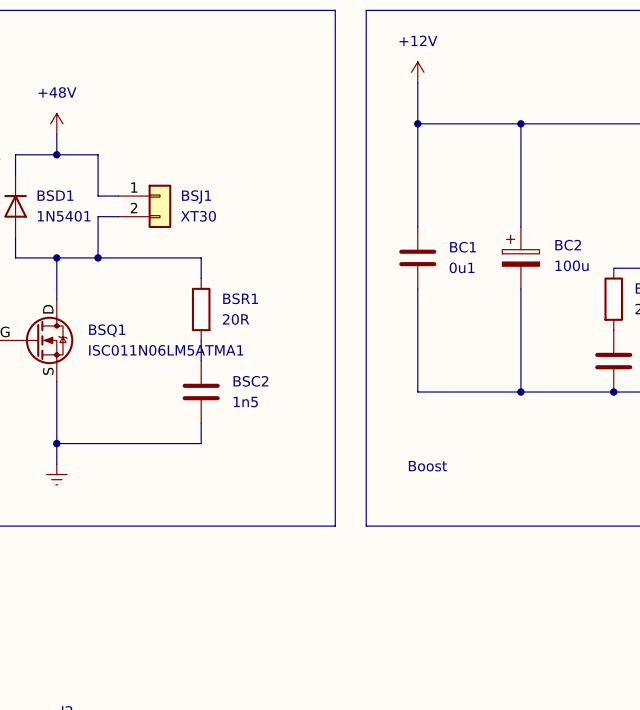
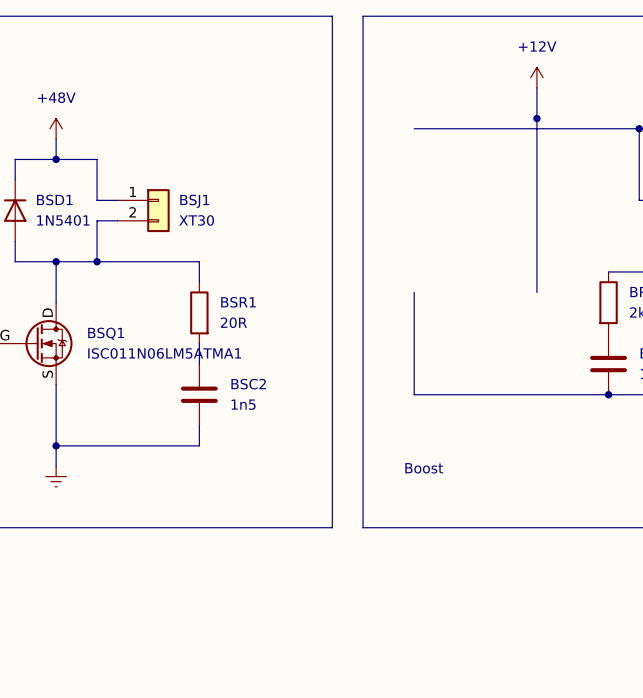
power symbol position: +12V (417, 72) -> +12V (536, 77)
wire: (417, 82) (417, 226) -> none
wire: none -> (536, 87) (536, 292)
junction: (417, 123) -> none
wire: (520, 123) (520, 226) -> none
junction position: (520, 123) -> (536, 118)
BC1: 0u1 (417, 257) -> none
BC2: 100u (520, 257) -> none
wire: (520, 288) (520, 392) -> none
junction: (520, 392) -> none

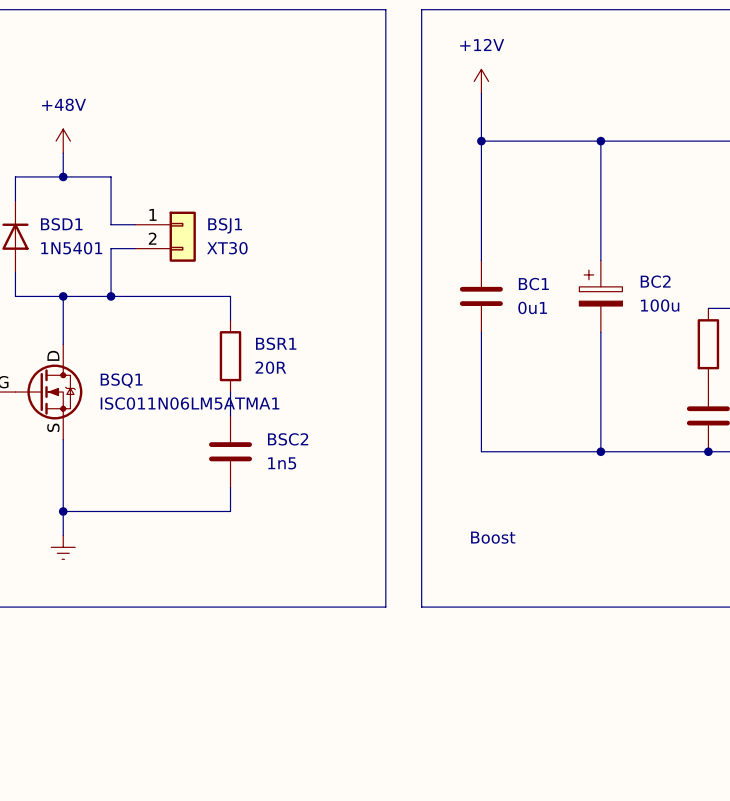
power symbol position: +12V (536, 77) -> +12V (481, 81)
wire: none -> (481, 93) (481, 260)
wire: (536, 87) (536, 292) -> none
junction position: (536, 118) -> (600, 141)
junction: none -> (481, 141)
wire: none -> (600, 141) (600, 260)
BC1: none -> 0u1 (481, 296)
BC2: none -> 100u (600, 296)
wire: none -> (600, 332) (600, 451)
junction: none -> (600, 451)

